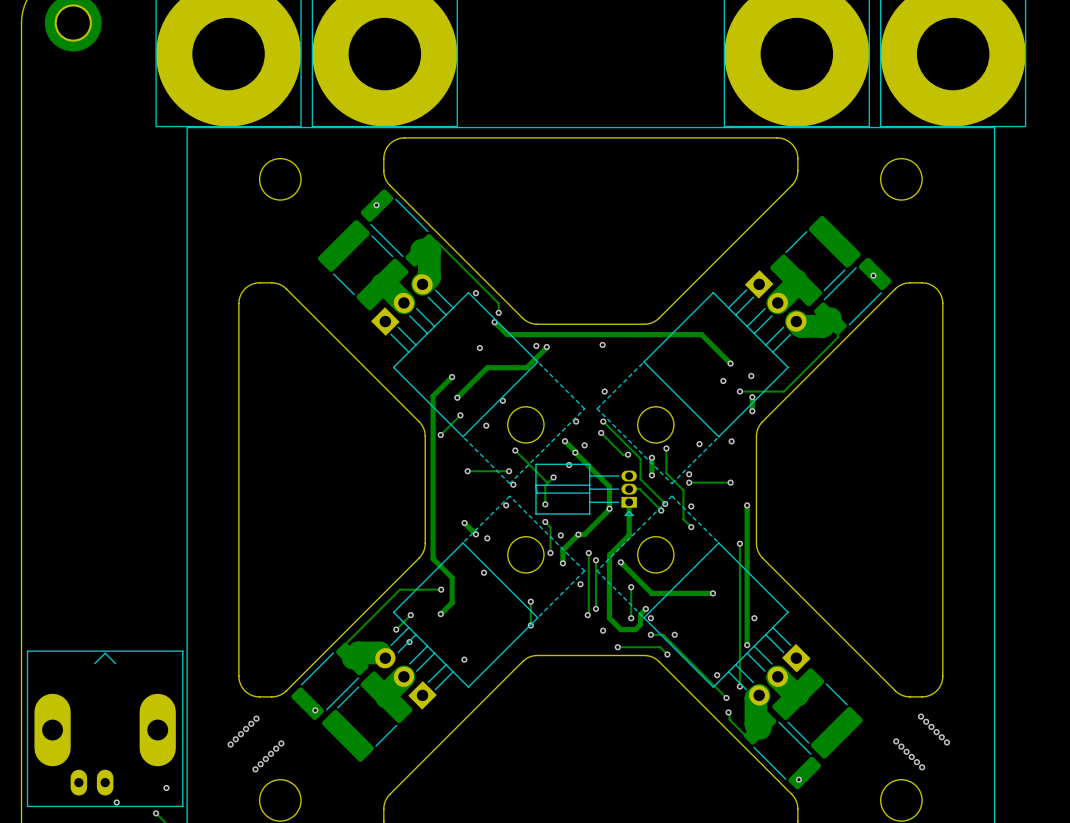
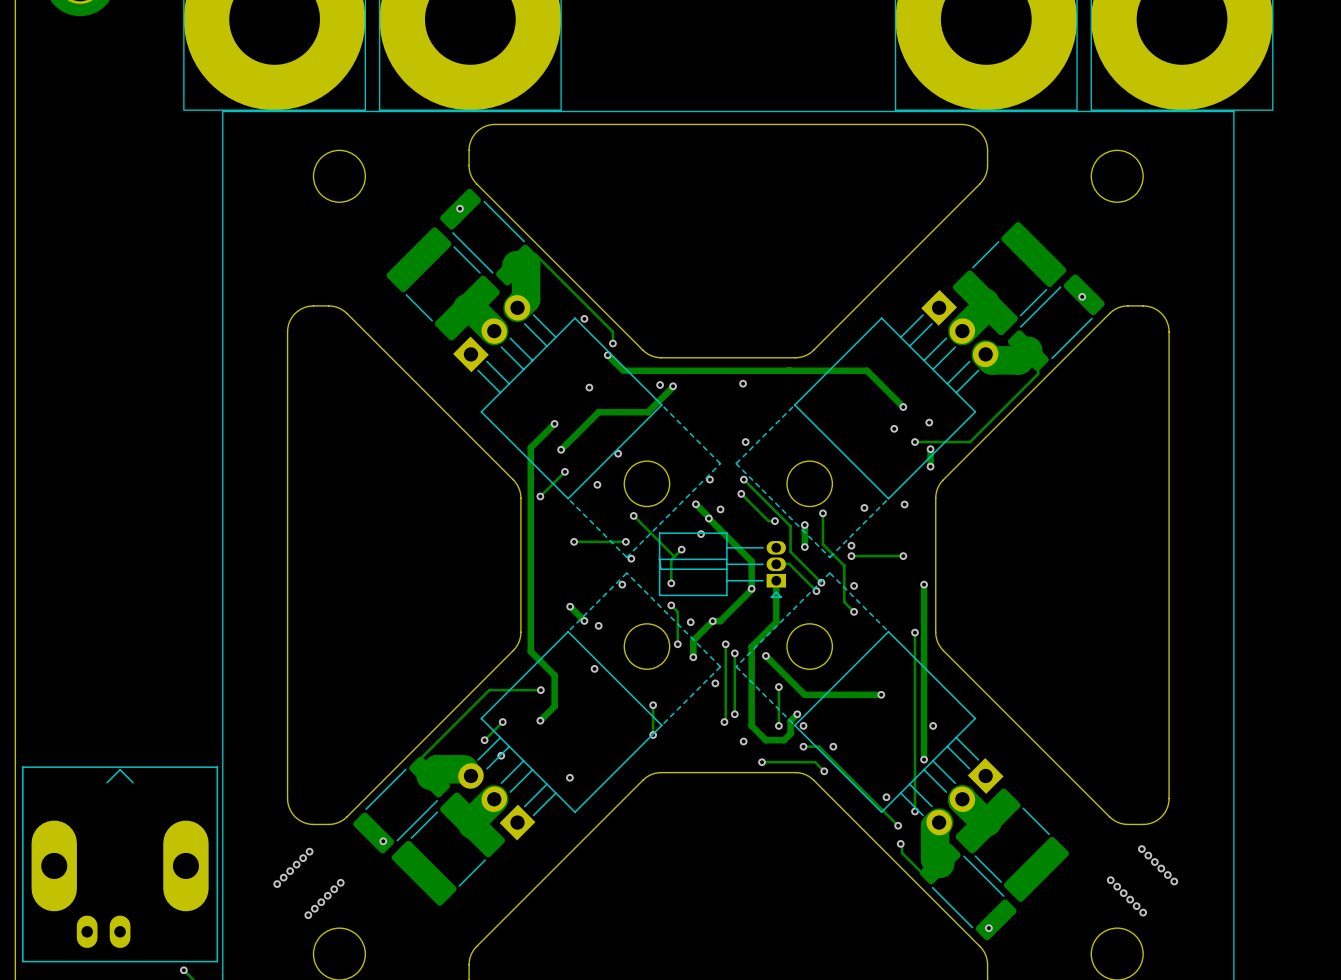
via: (166, 788) -> none
via: (116, 802) -> none

